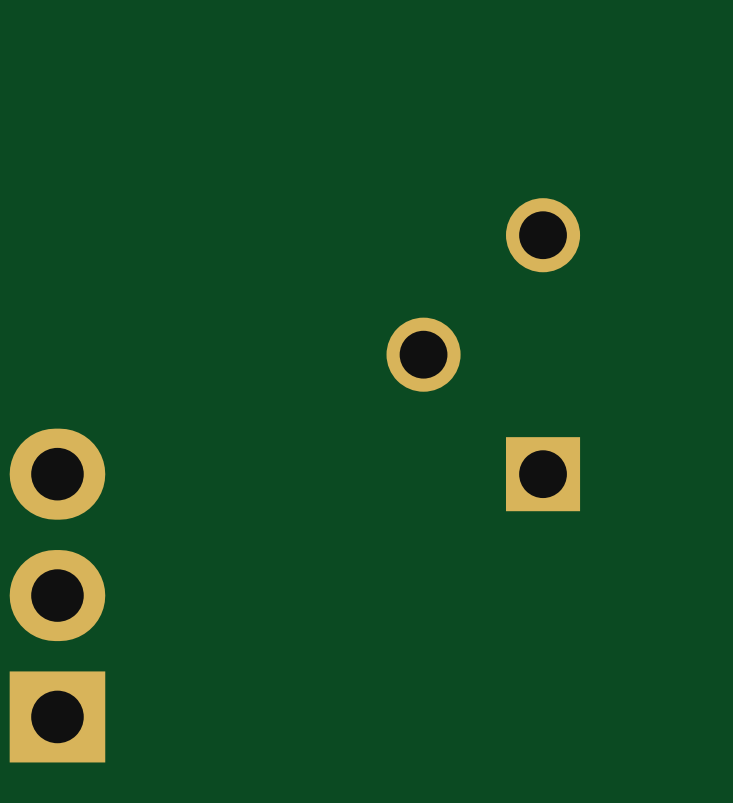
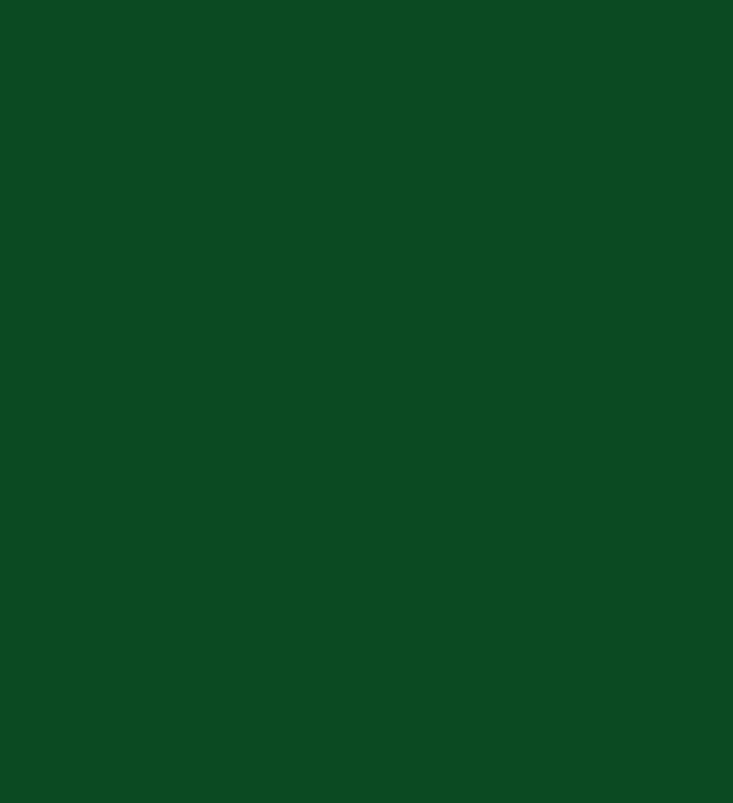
part: (483, 354) -> none
part: (57, 595) -> none

